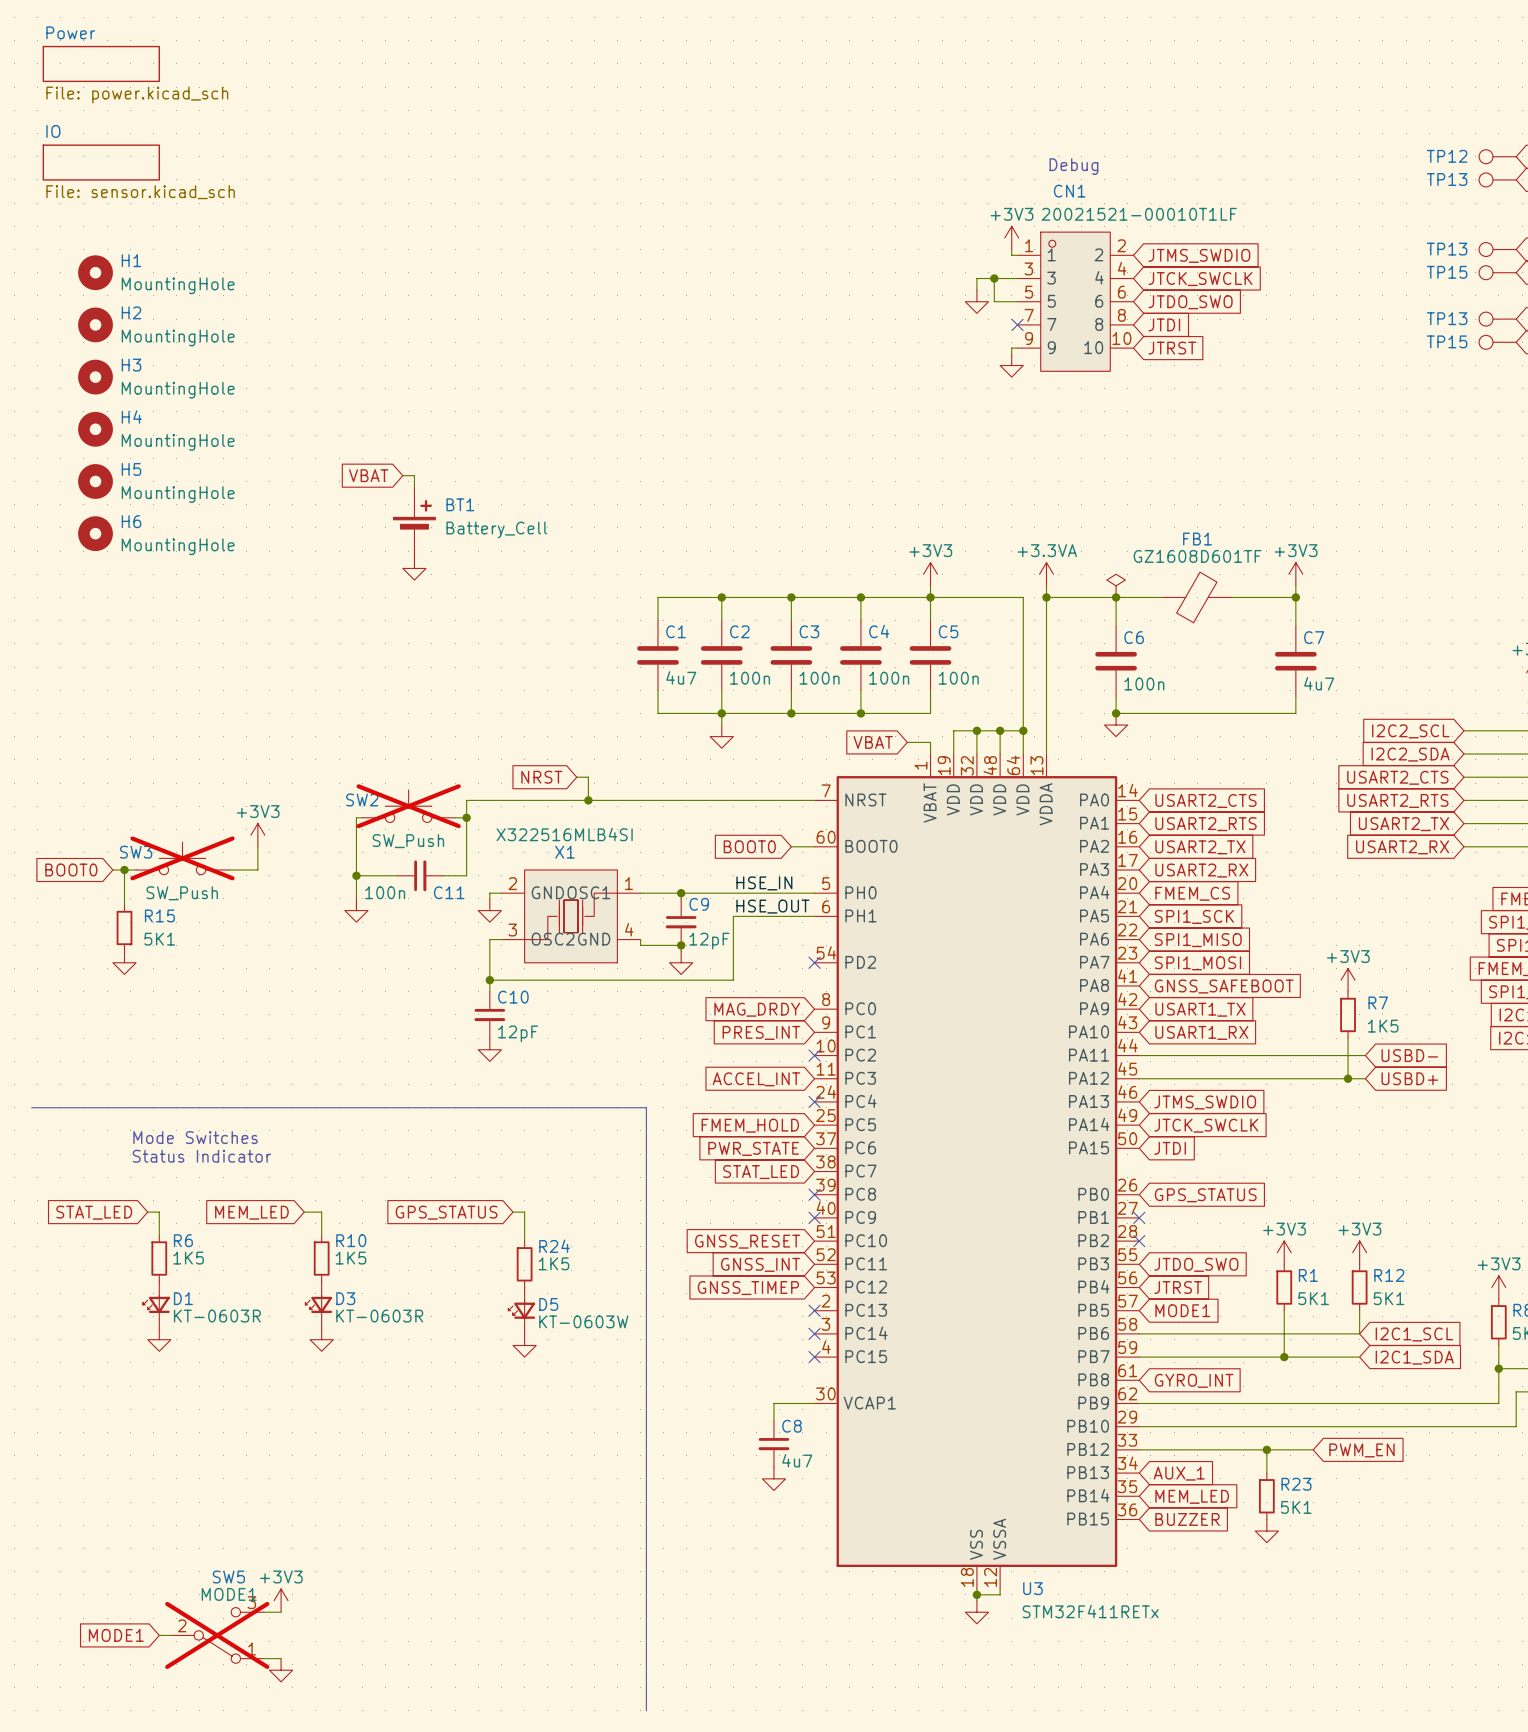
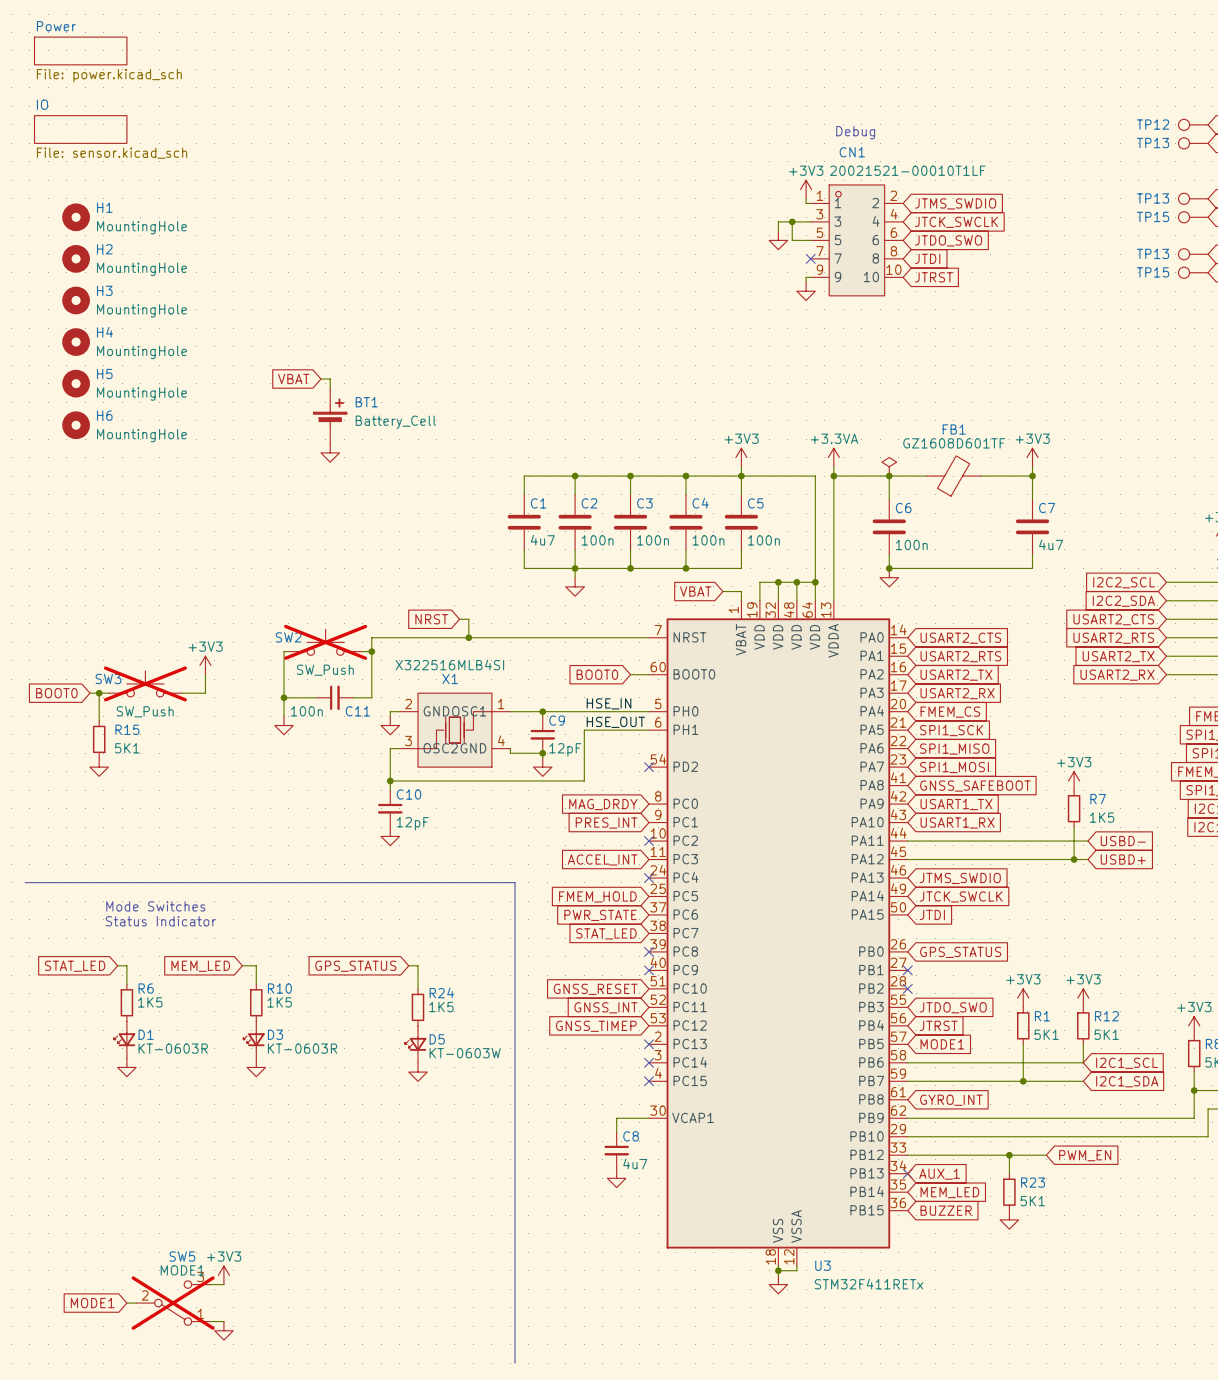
no-connect mark: none -> (907, 1173)

